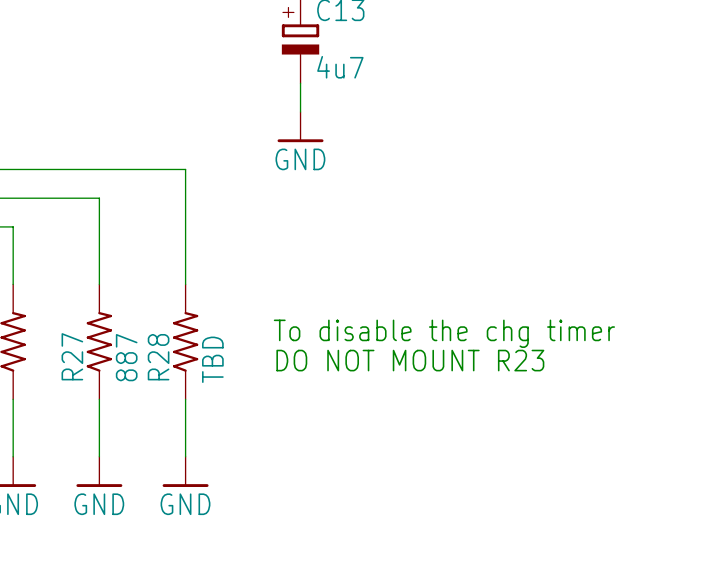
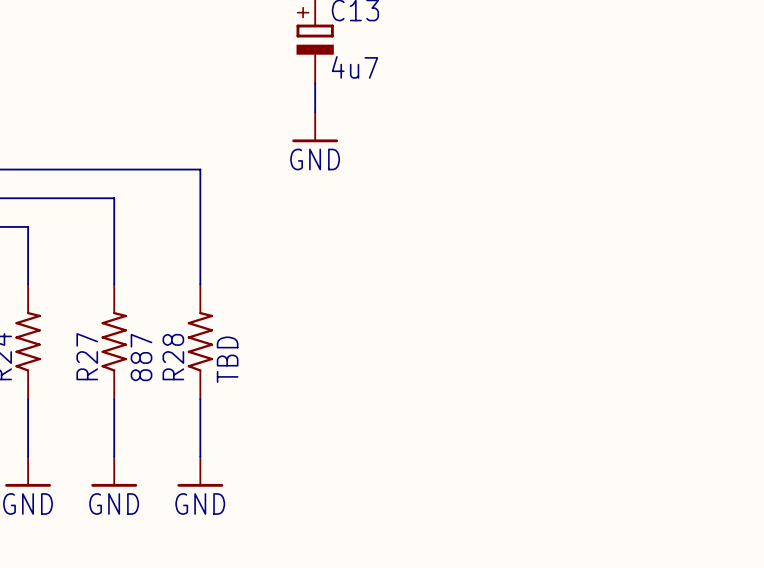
text: To disable the chg timer (444, 333) -> none
text: DO NOT MOUNT R23 (410, 360) -> none

